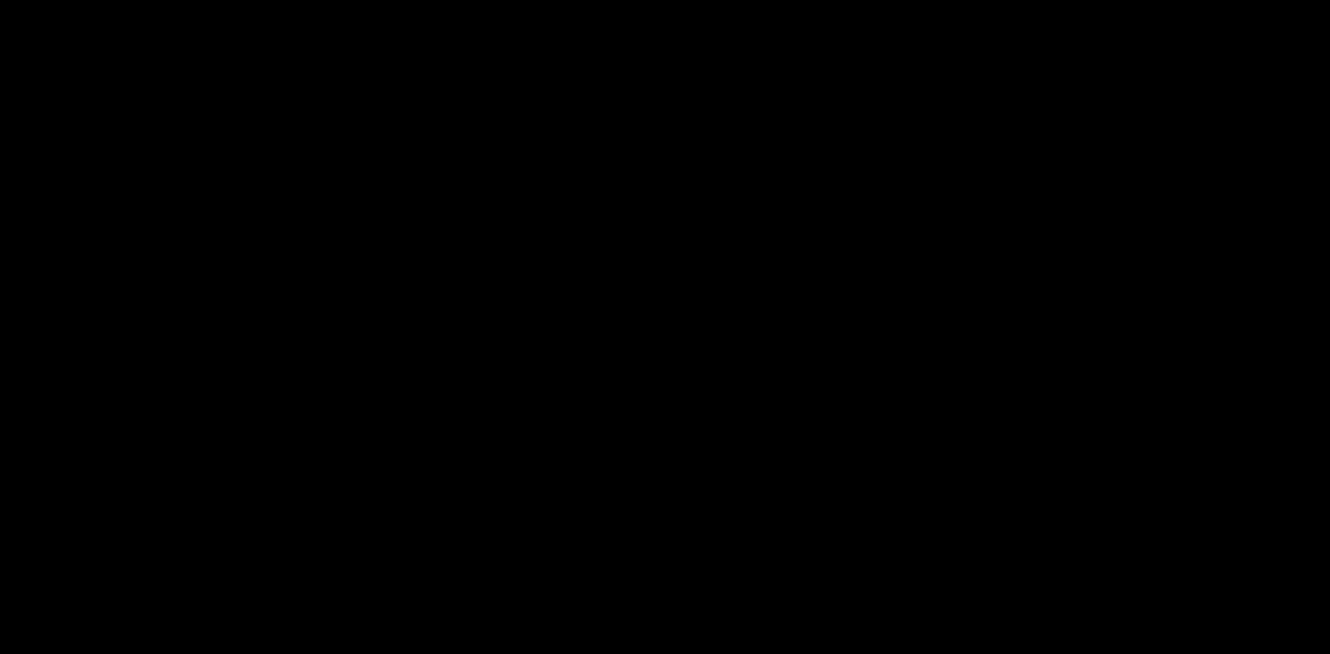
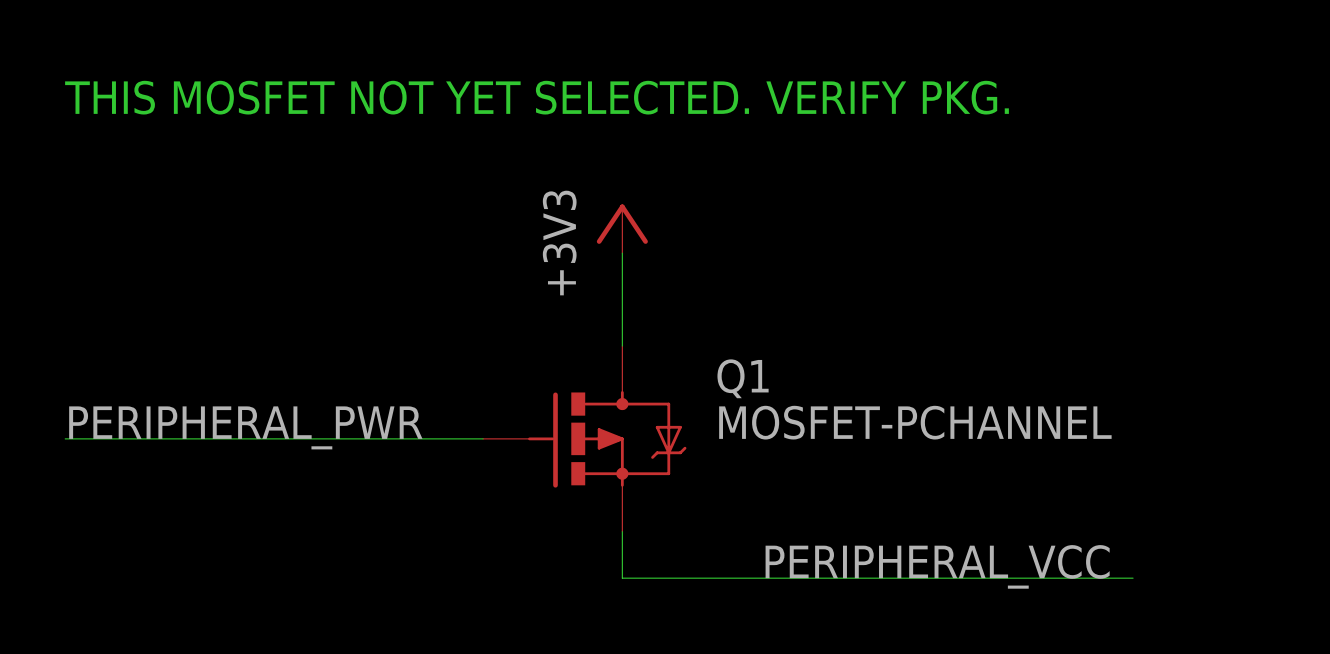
text: none -> THIS MOSFET NOT YET SELECTED. VERIFY PKG. (537, 97)
power symbol: none -> +3V3 (622, 228)
wire: none -> (622, 253) (622, 346)
label: none -> PERIPHERAL_PWR (245, 427)
wire: none -> (65, 438) (483, 438)
Q1: none -> MOSFET-PCHANNEL (584, 438)
wire: none -> (622, 531) (622, 578) (1133, 578)
label: none -> PERIPHERAL_VCC (937, 566)

